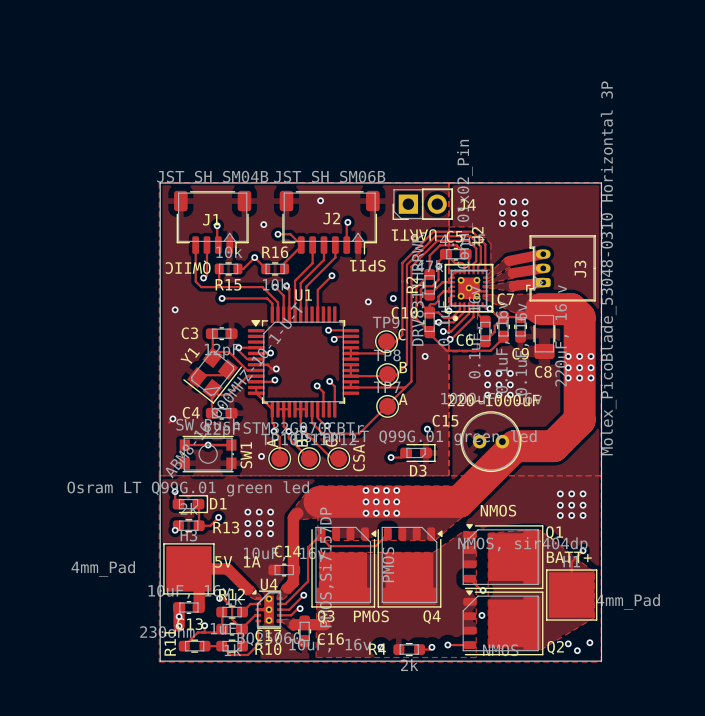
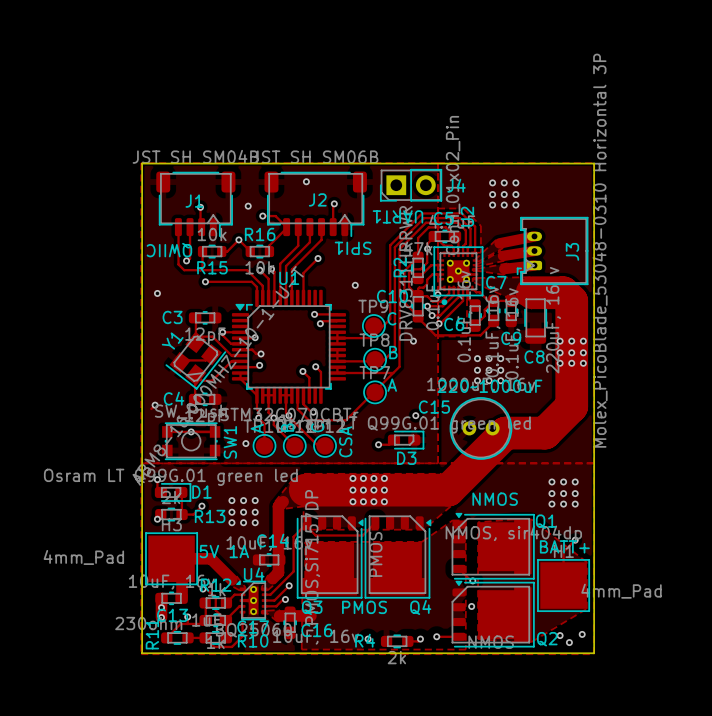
track: (464, 271) (455, 271) (452, 277) -> none
via: (393, 298) -> none
via: (489, 308) -> none

